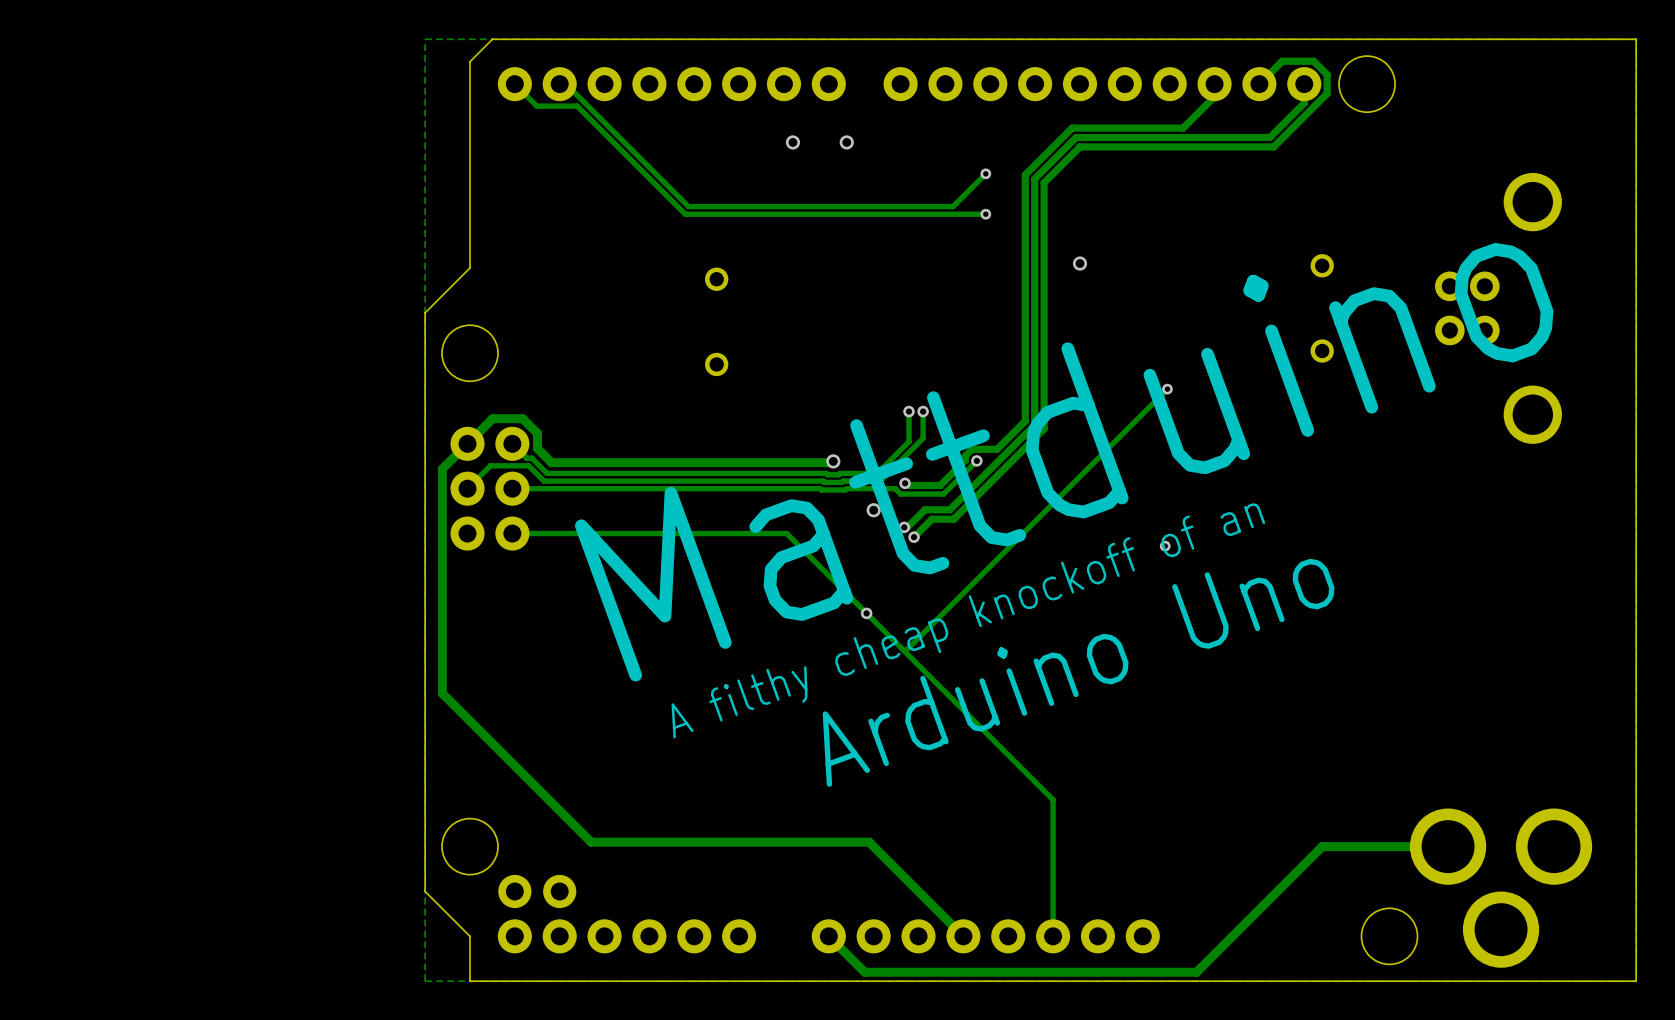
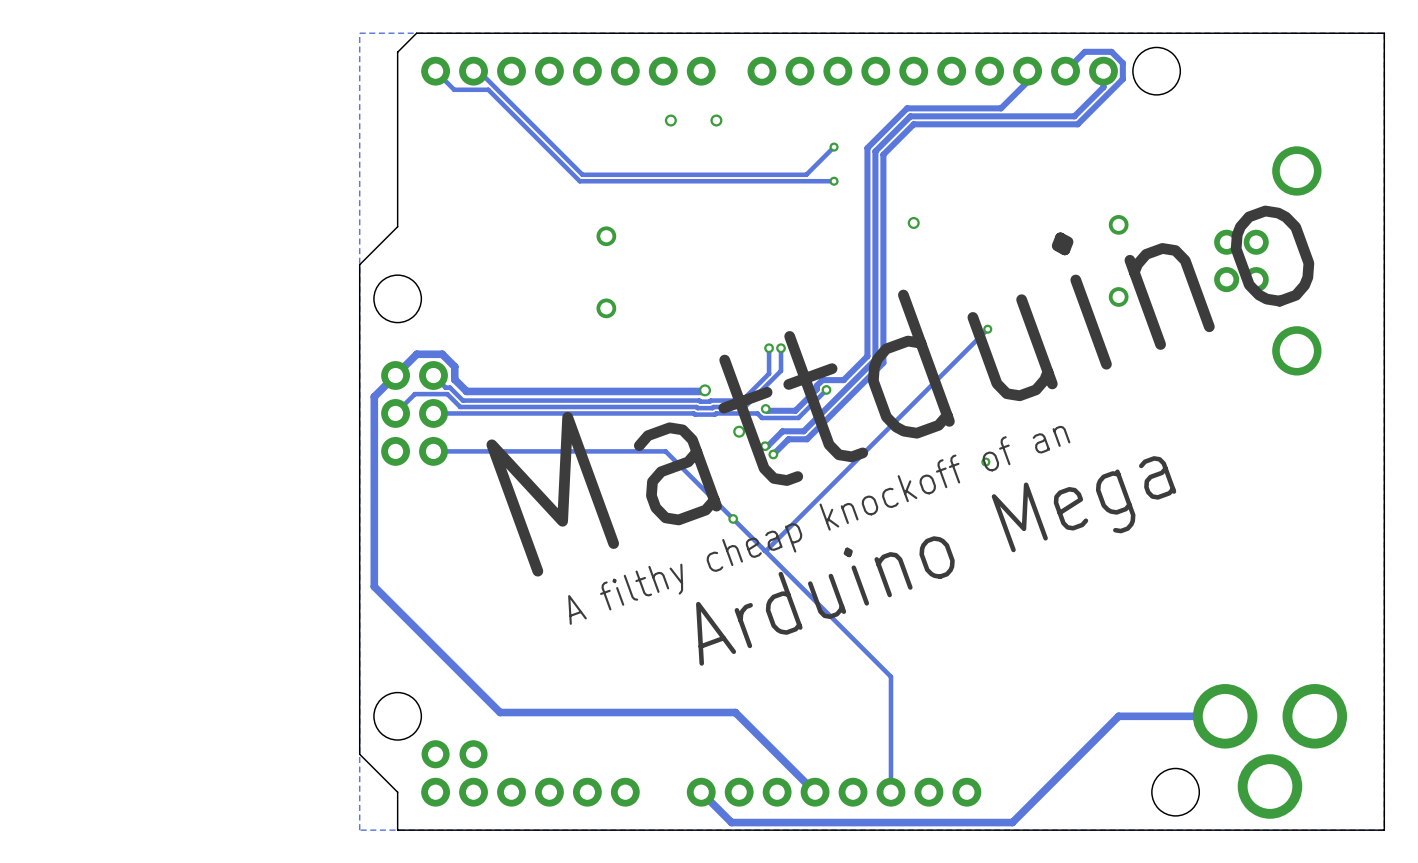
text: Arduino Uno (1078, 672) -> Arduino Mega (936, 560)

